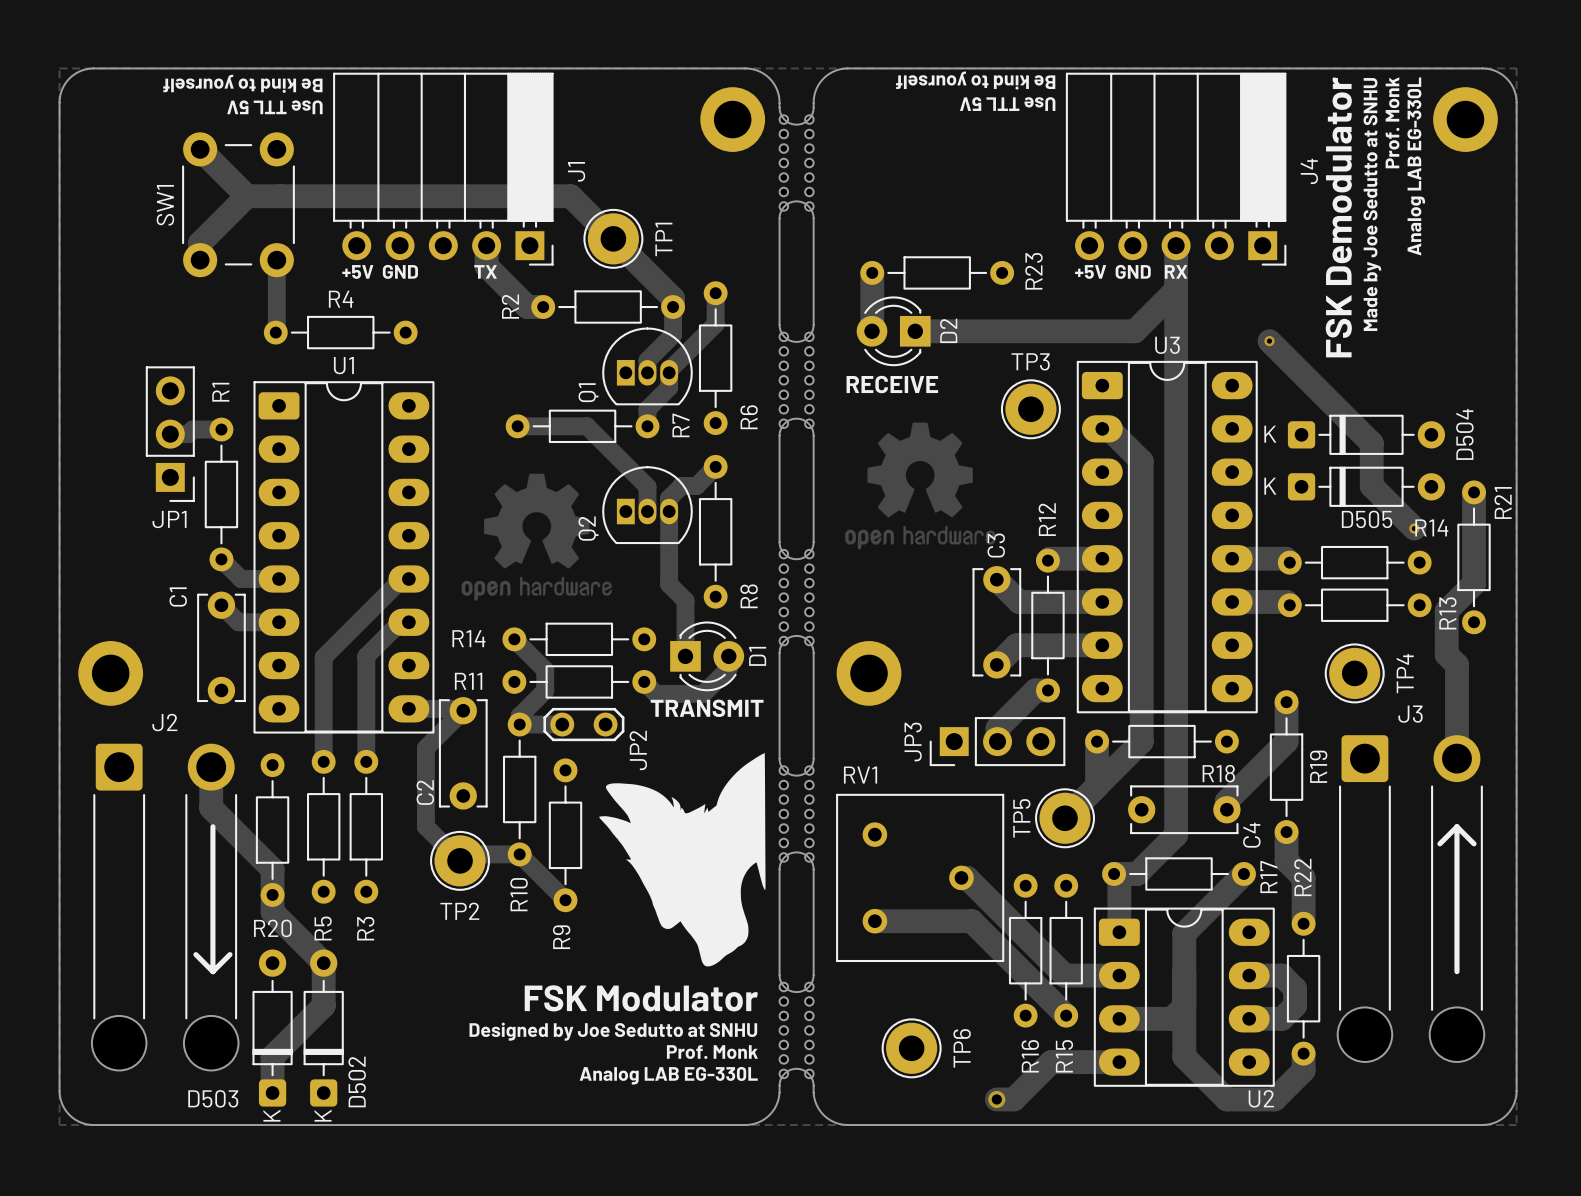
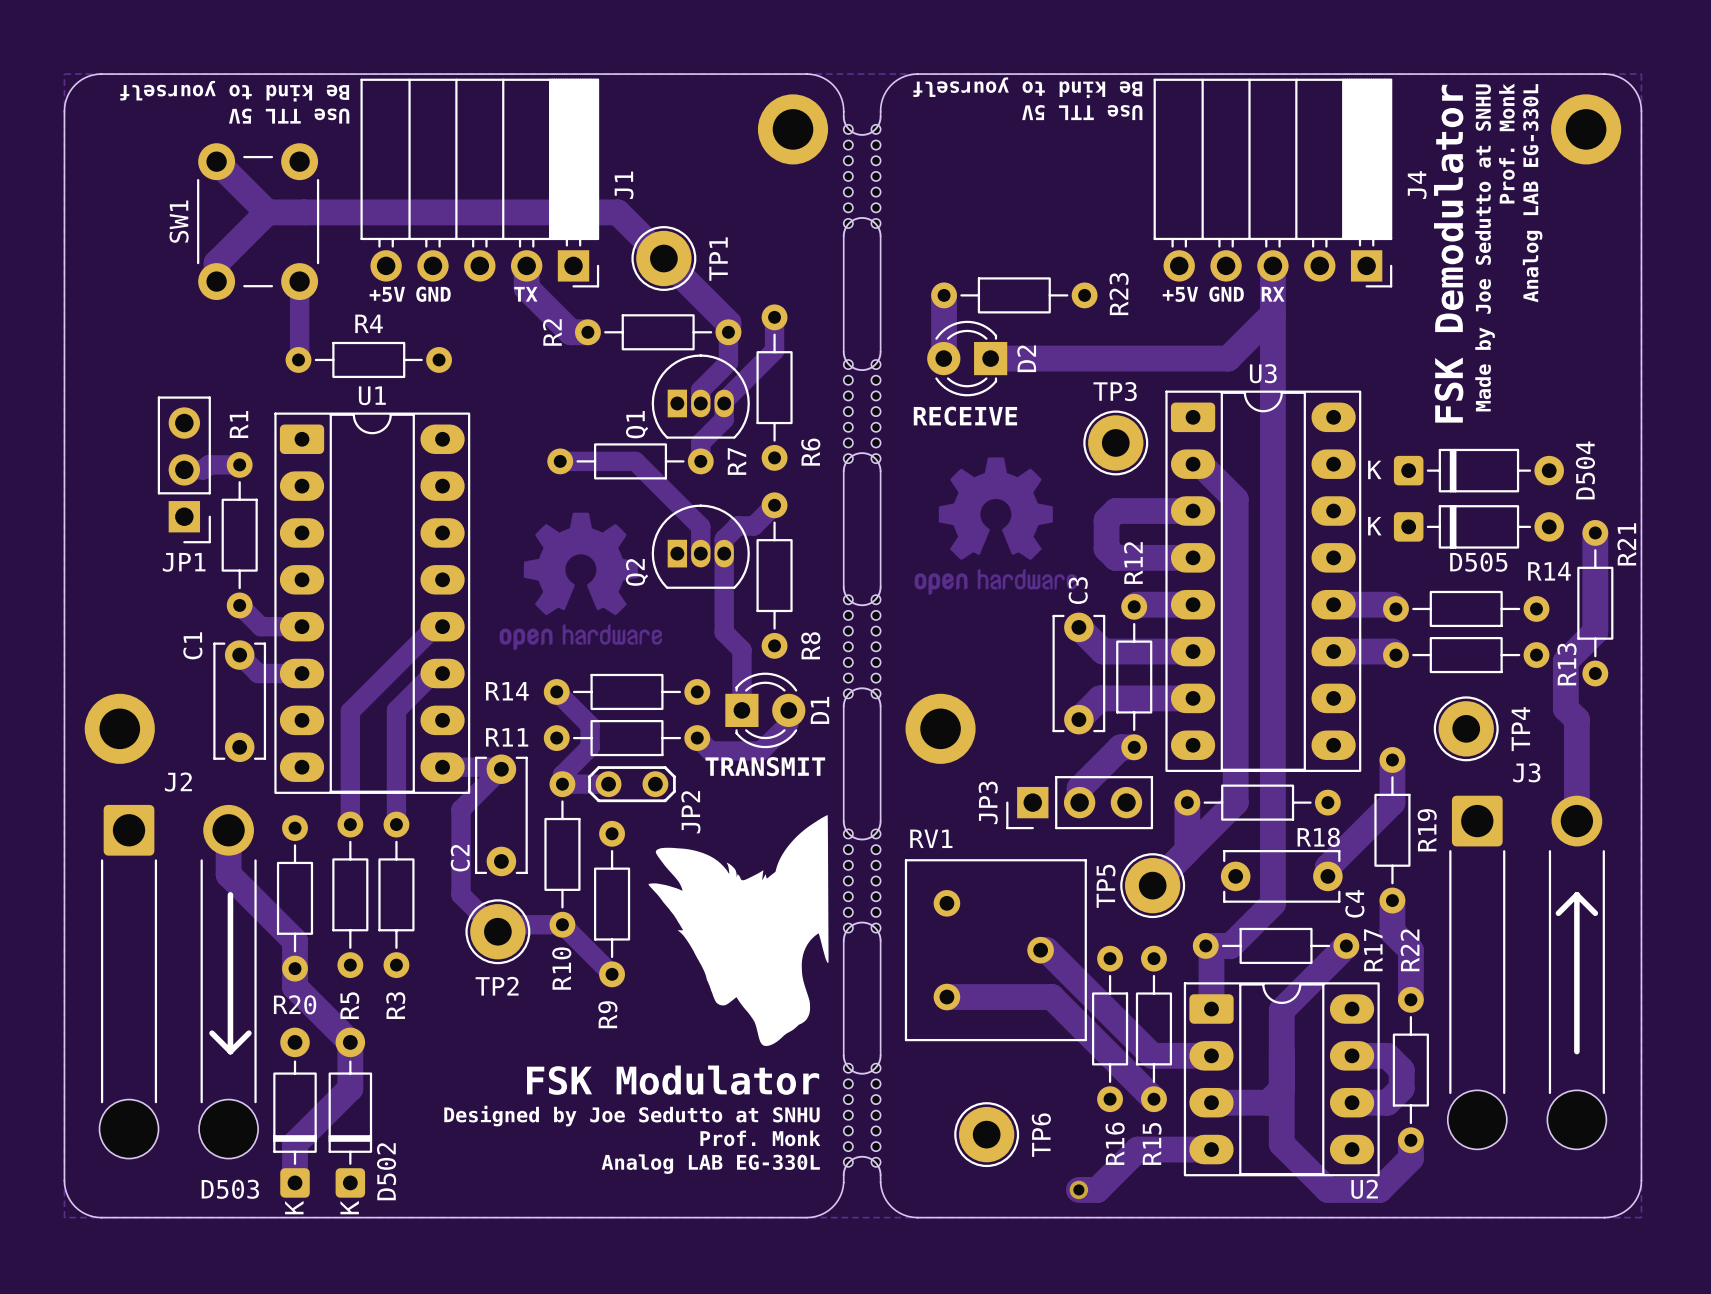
track: (1269, 341) (1371, 443) (1371, 485) (1414, 528) -> none
via: (1269, 341) -> none
track: none -> (1193, 511) (1115, 511) (1106, 520) (1106, 548) (1115, 557) (1193, 557)
via: (1414, 528) -> none

